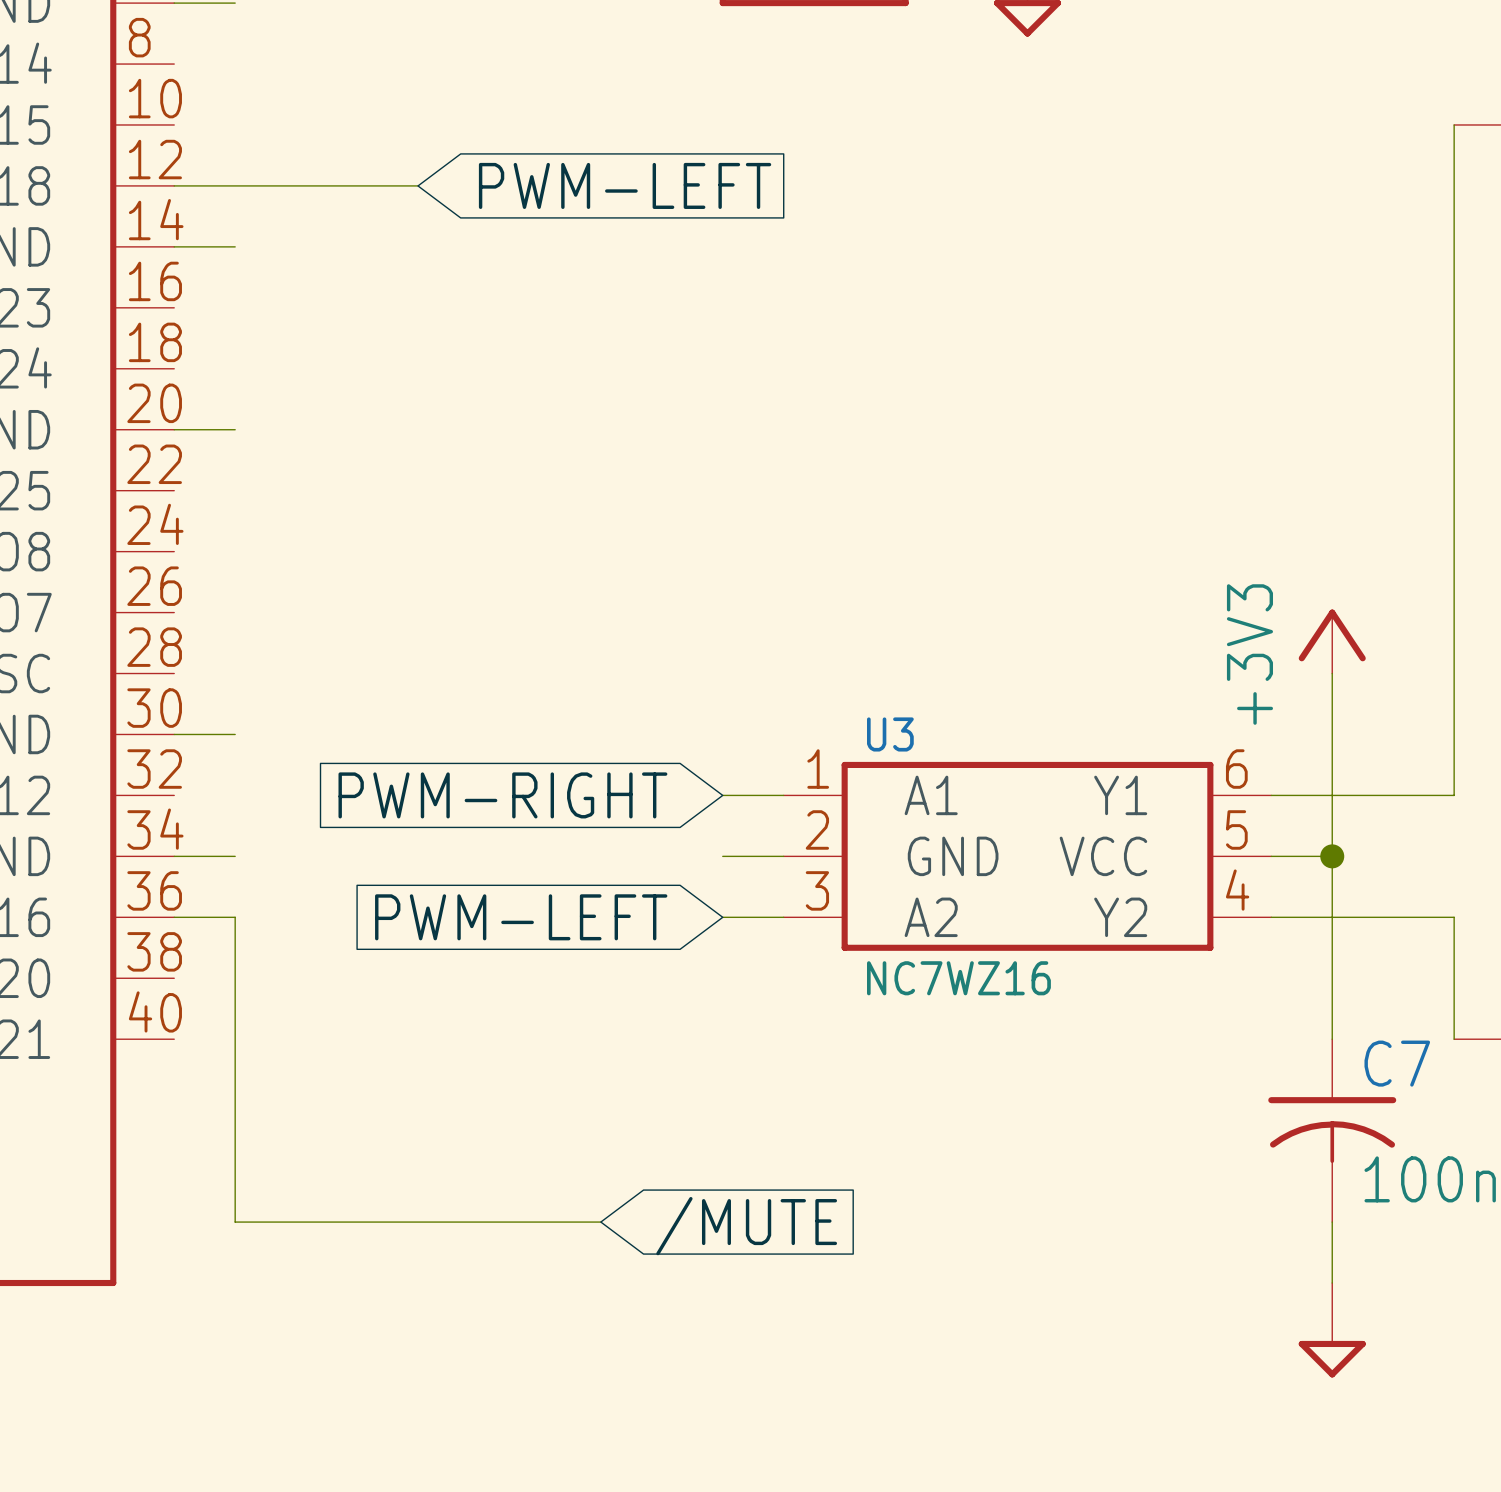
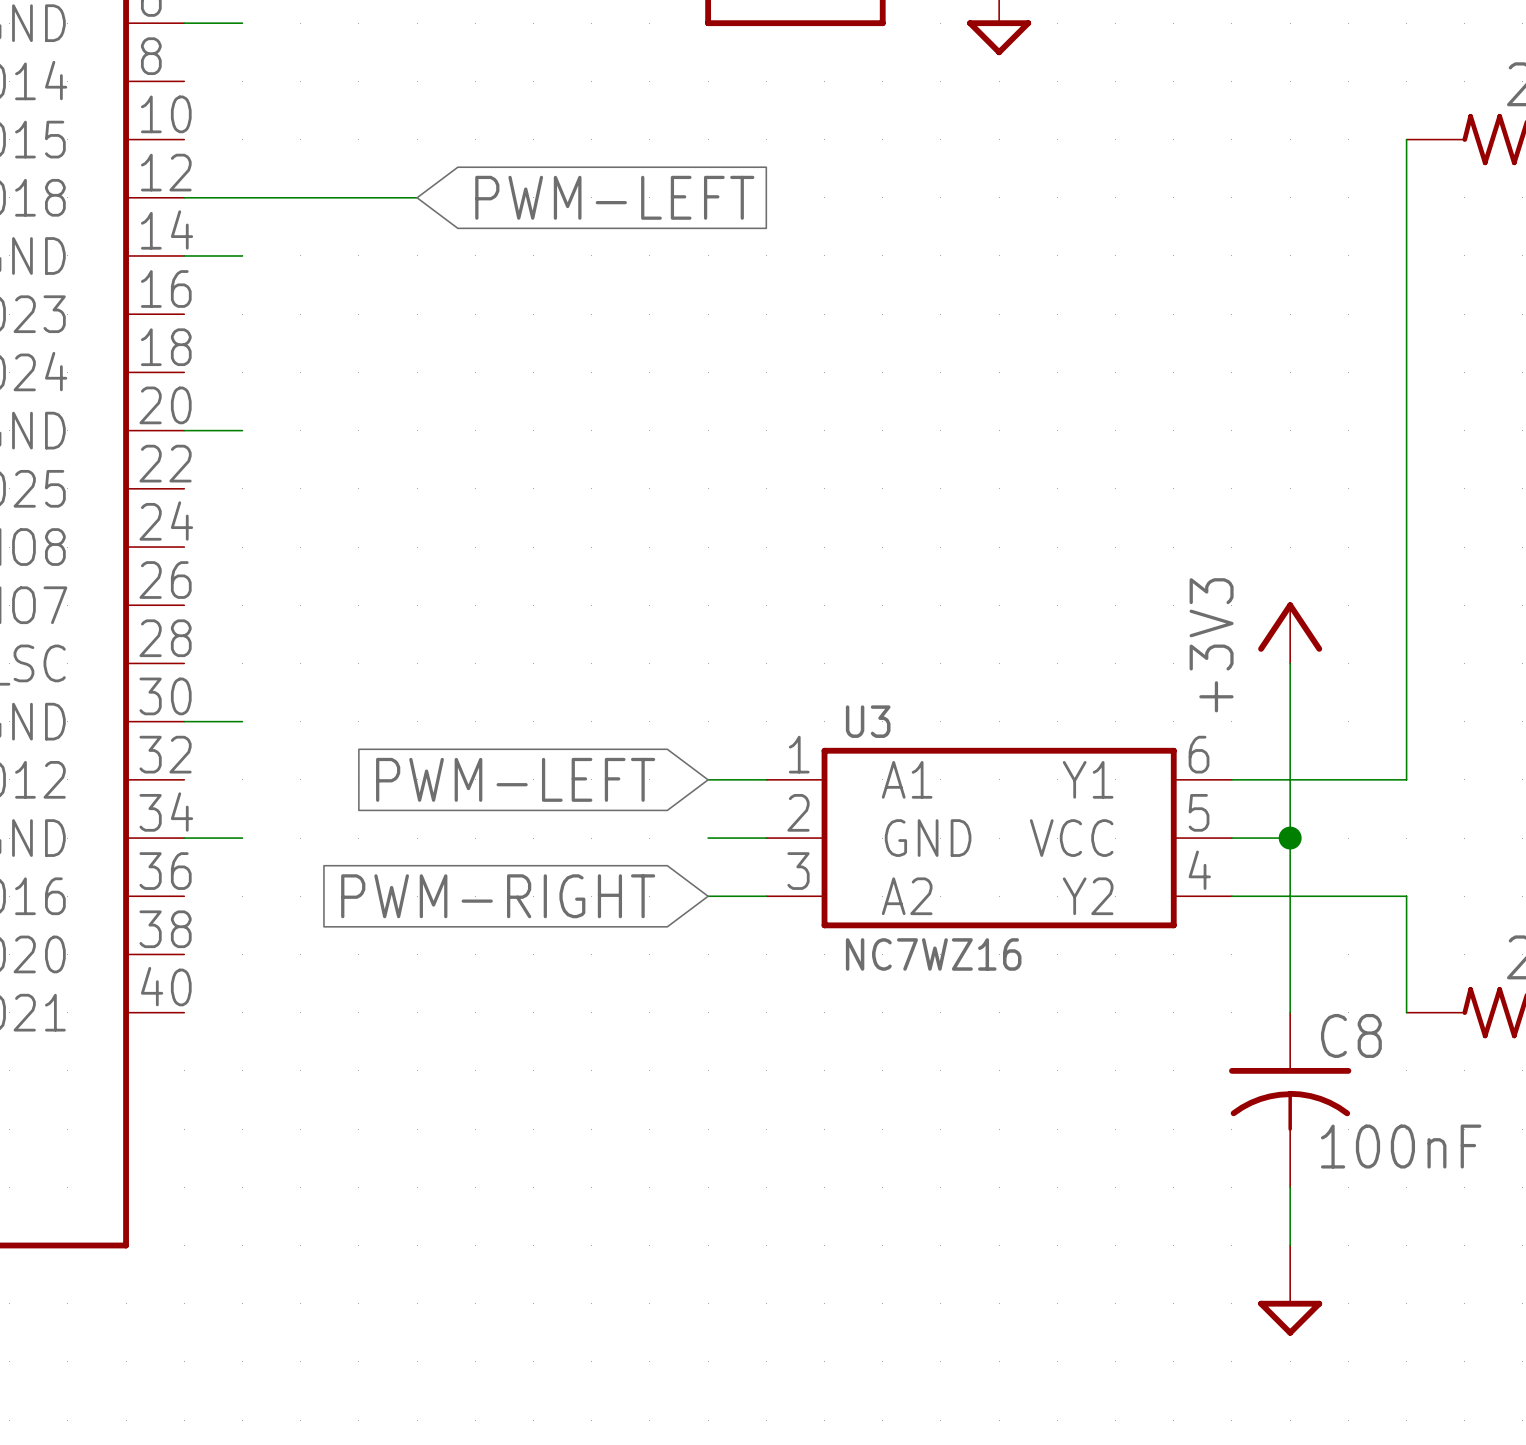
global label: PWM-RIGHT (502, 795) -> PWM-LEFT (515, 779)
wire: (174, 917) (235, 917) (235, 1222) (600, 1222) -> none
global label: PWM-LEFT (521, 917) -> PWM-RIGHT (498, 896)
C7 name: C7 (1397, 1063) -> C8 (1351, 1035)
global label: /MUTE (746, 1226) -> none

